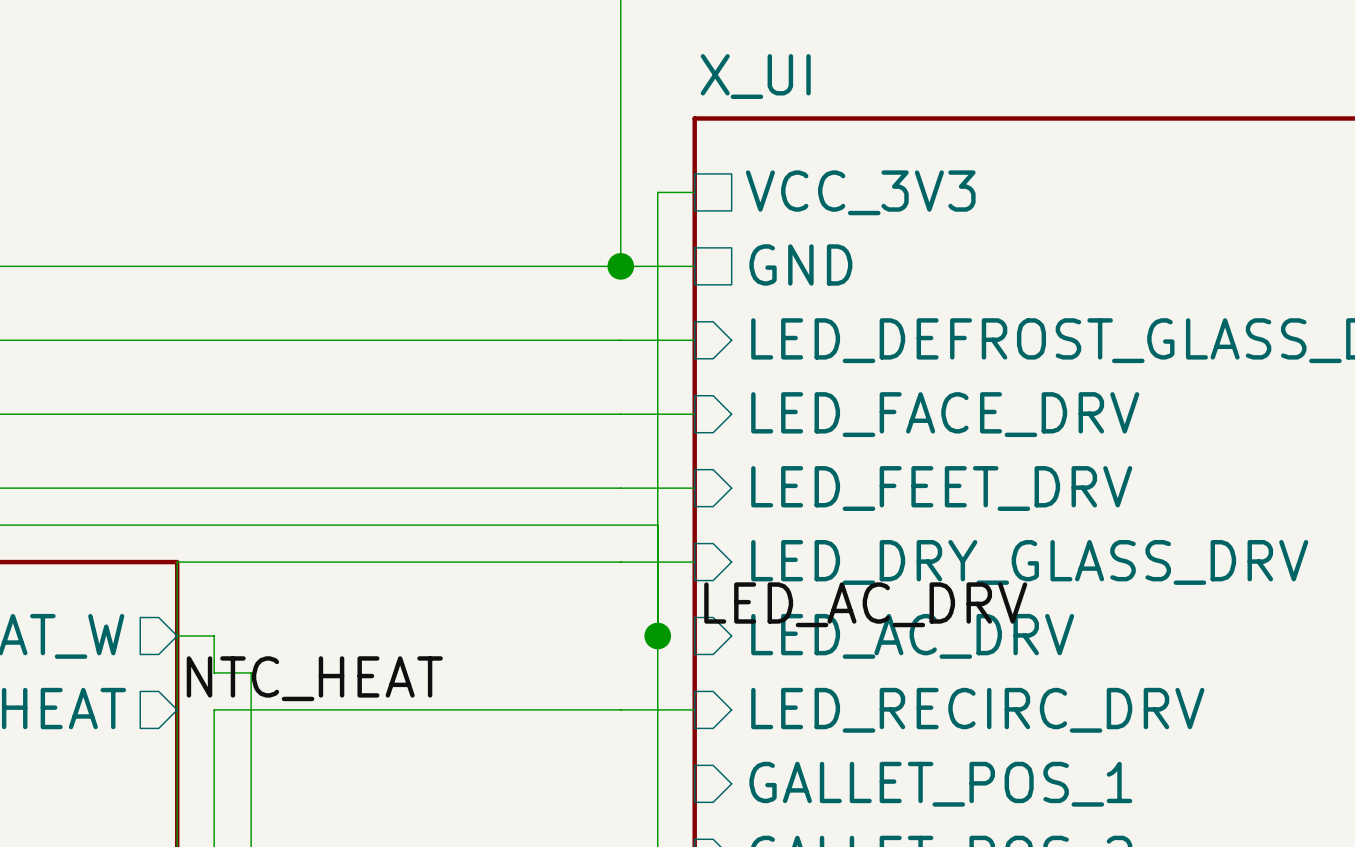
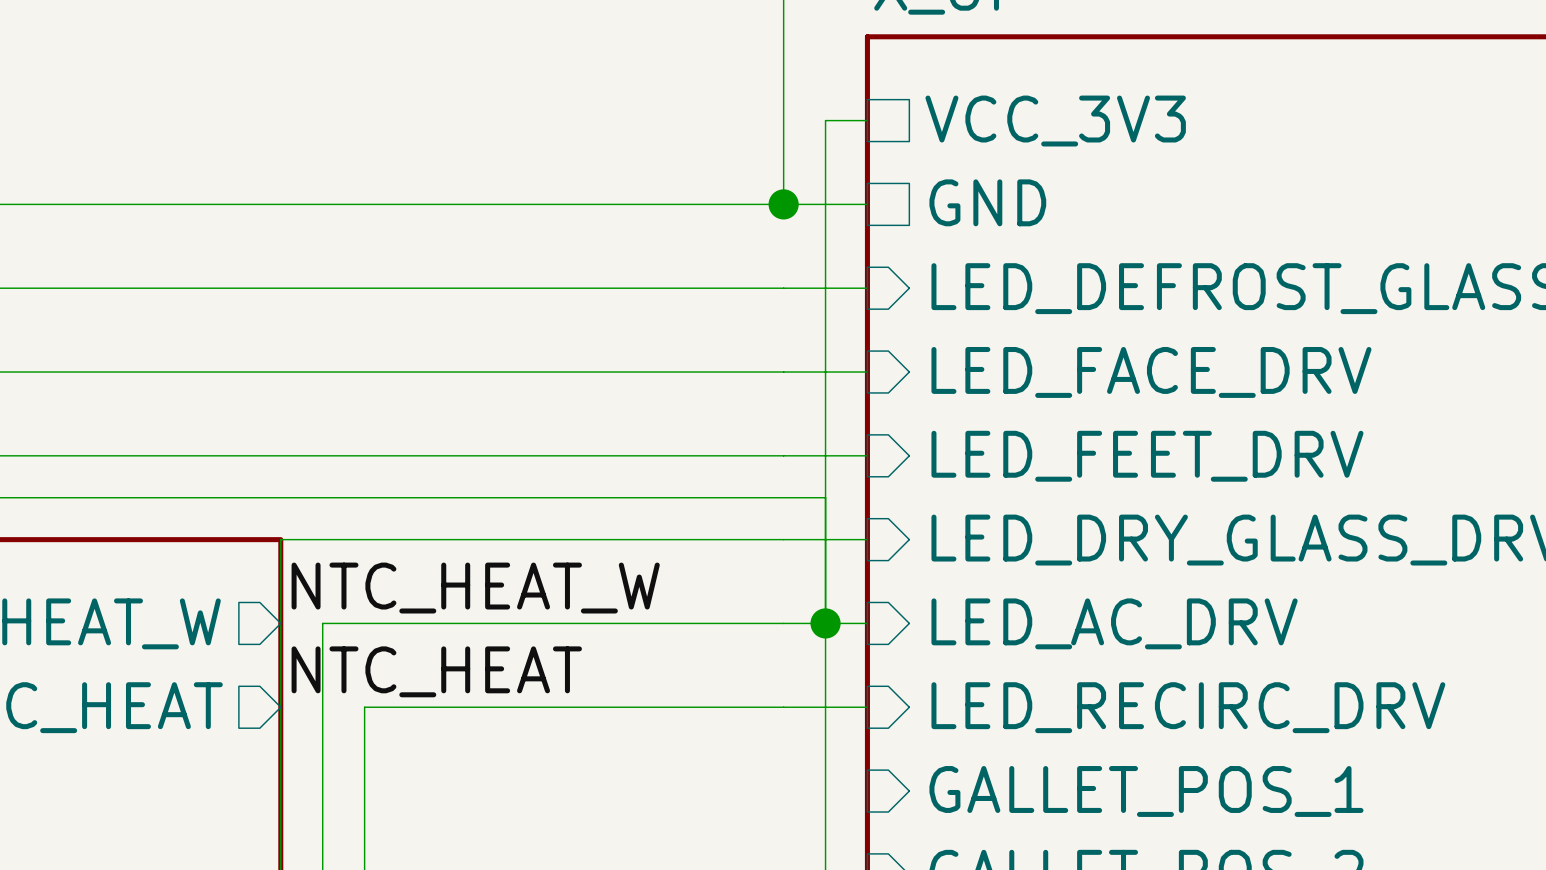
label: none -> NTC_HEAT_W (475, 588)
label: LED_AC_DRV (865, 604) -> none
wire: (177, 635) (214, 635) -> (867, 623) (322, 623)
wire: (214, 672) (251, 672) (251, 709) (214, 709) -> (322, 665) (322, 707)

